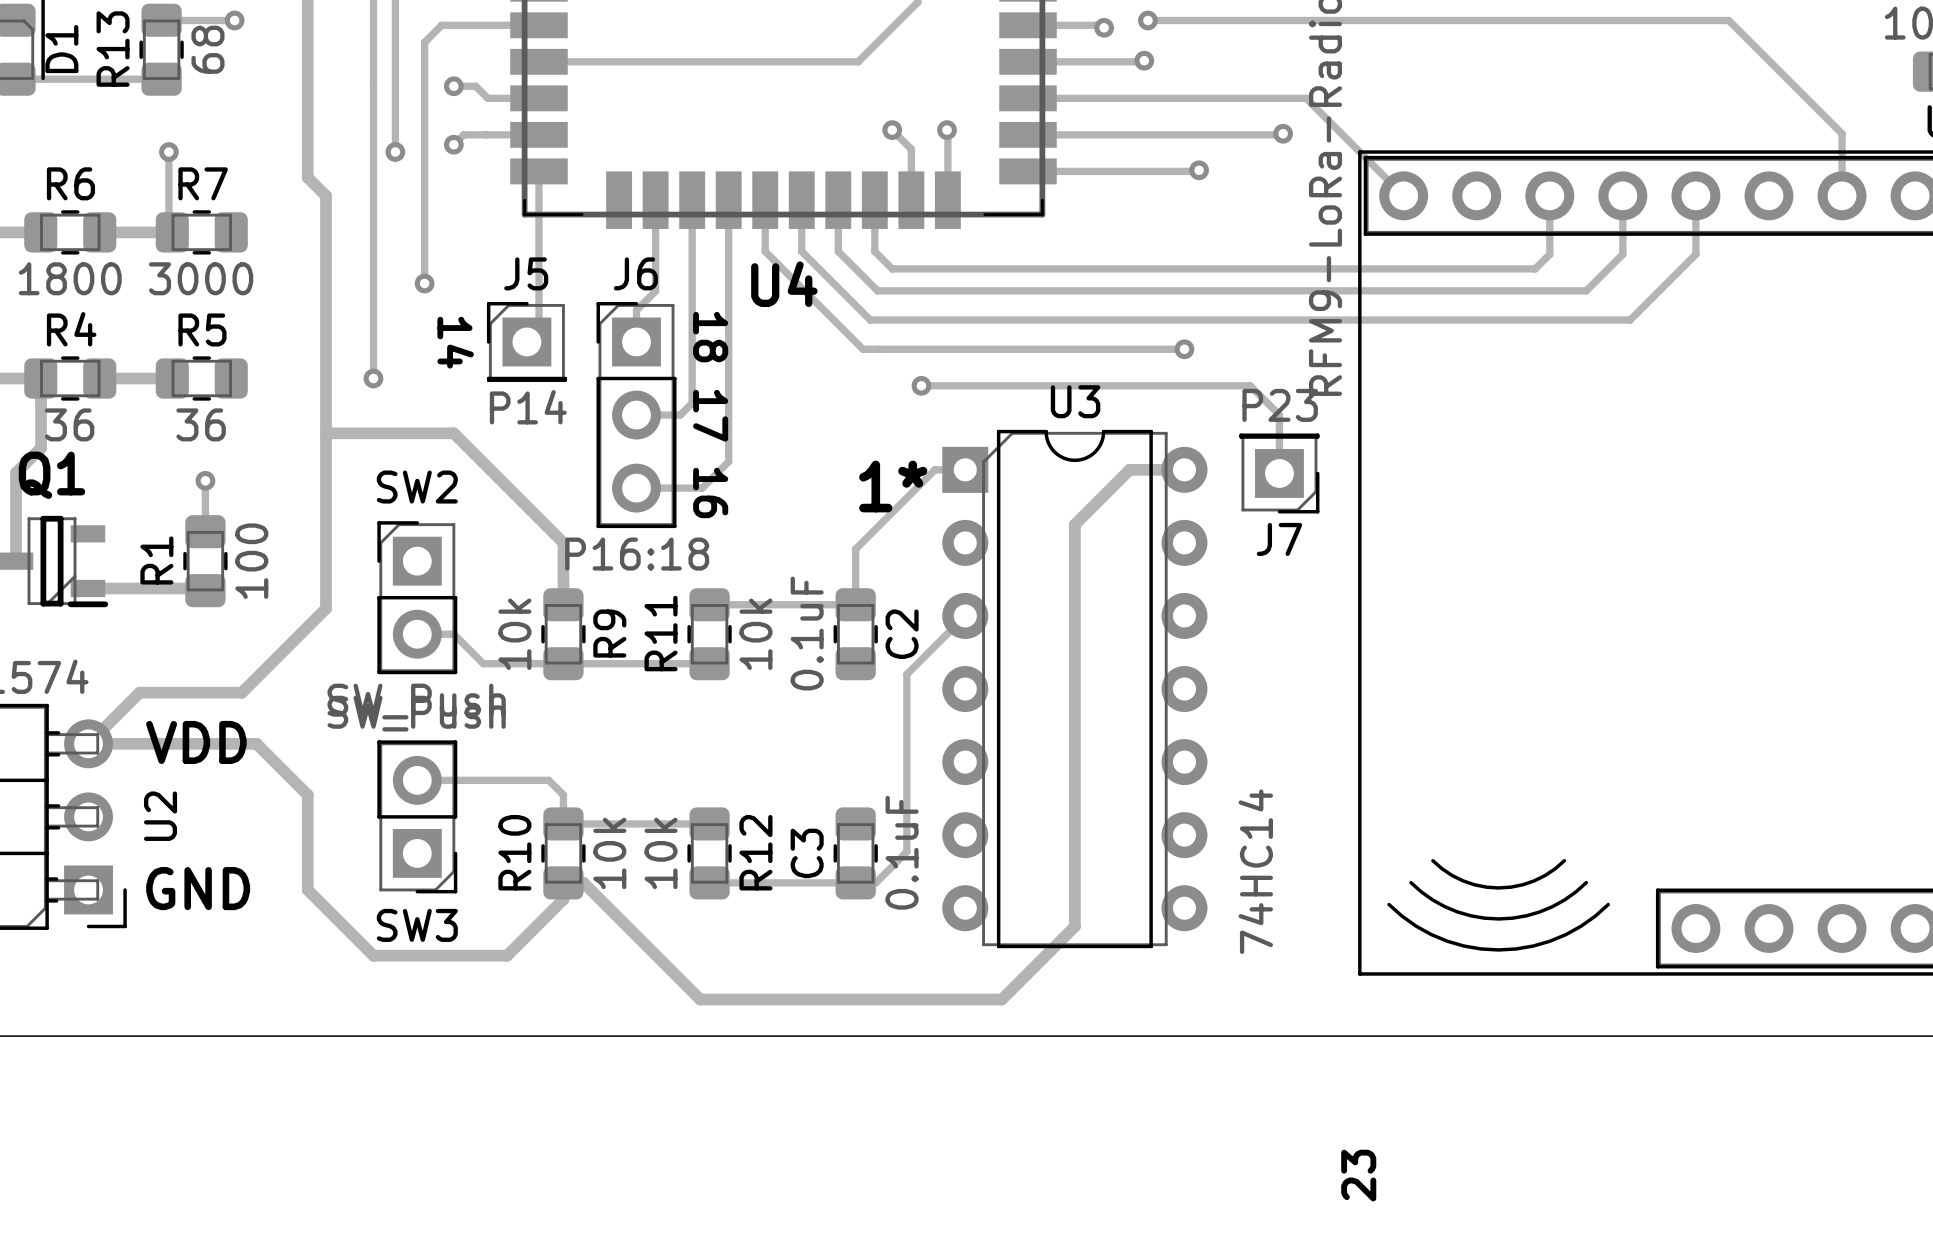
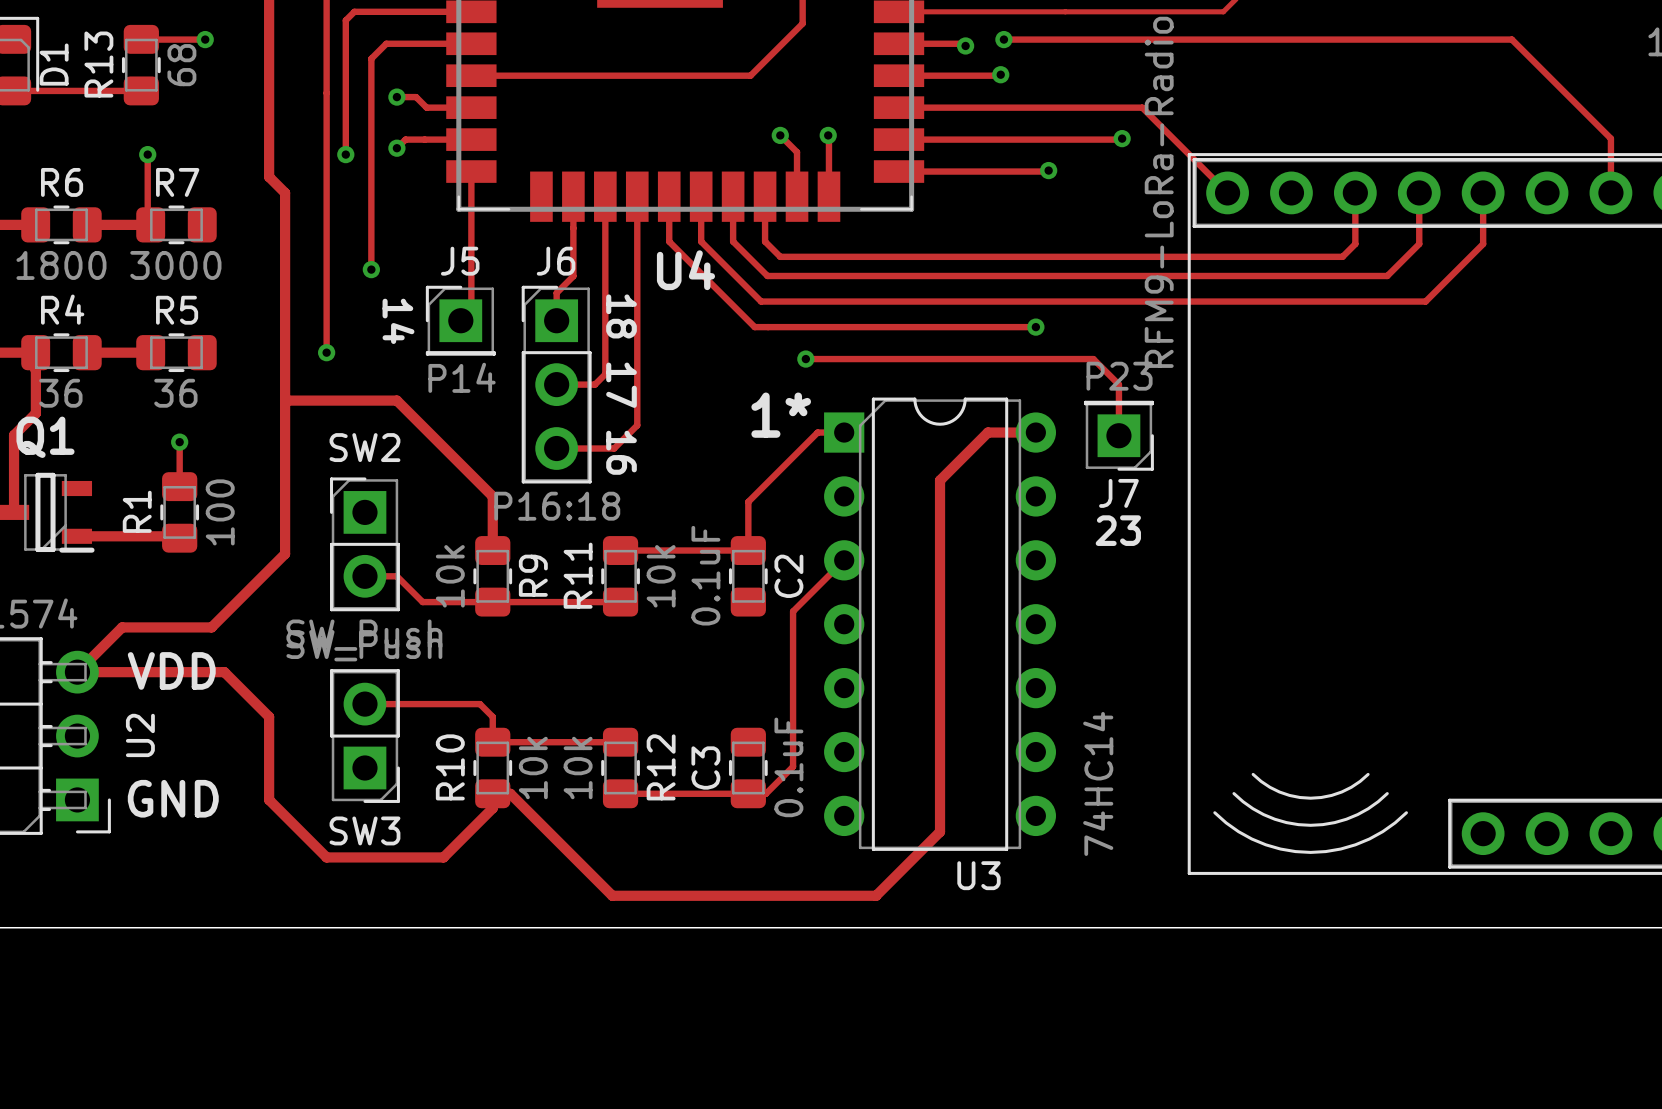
U3 name position: U3 (1075, 401) -> U3 (978, 875)
text position: 1* (893, 486) -> 1* (781, 415)
text rotation: 0° (1358, 1175) -> 90° clockwise (1118, 530)
text position: 23 (1358, 1175) -> 23 (1118, 530)

